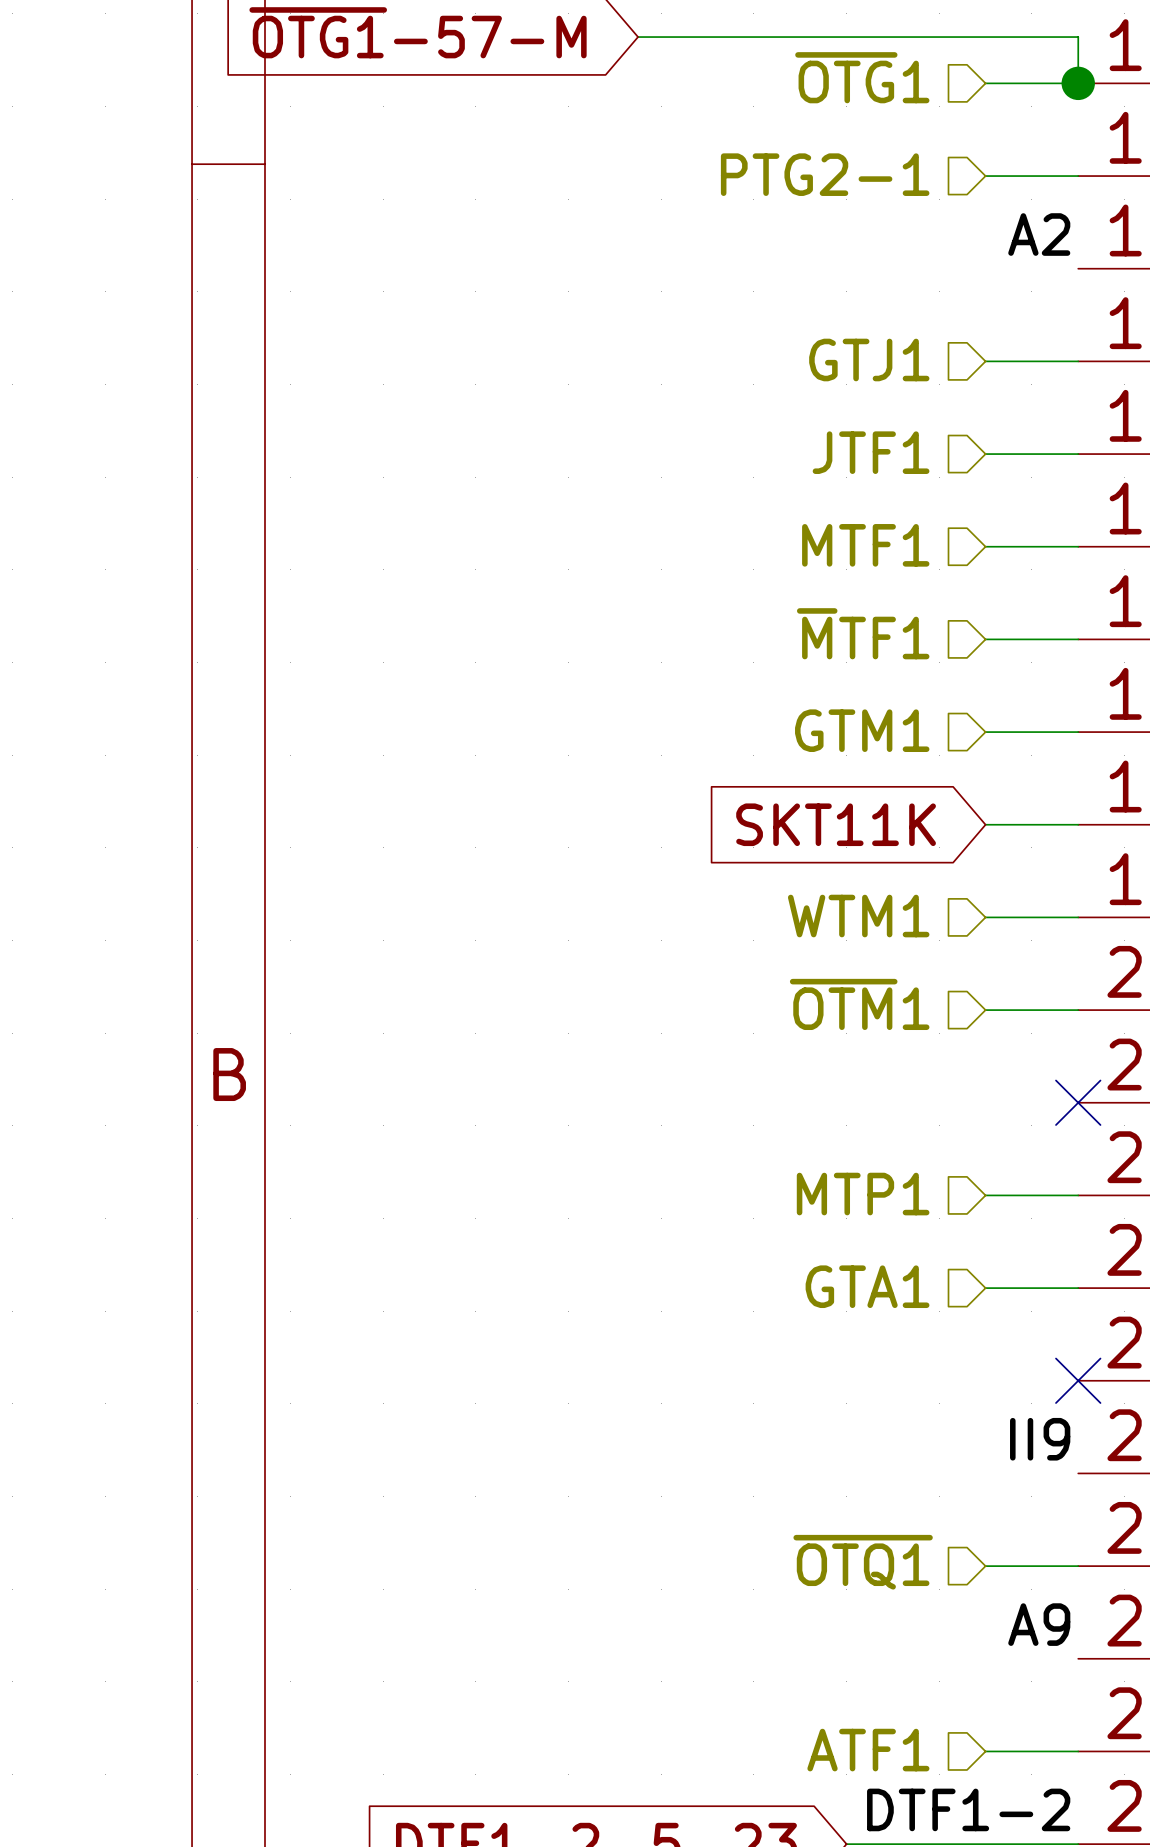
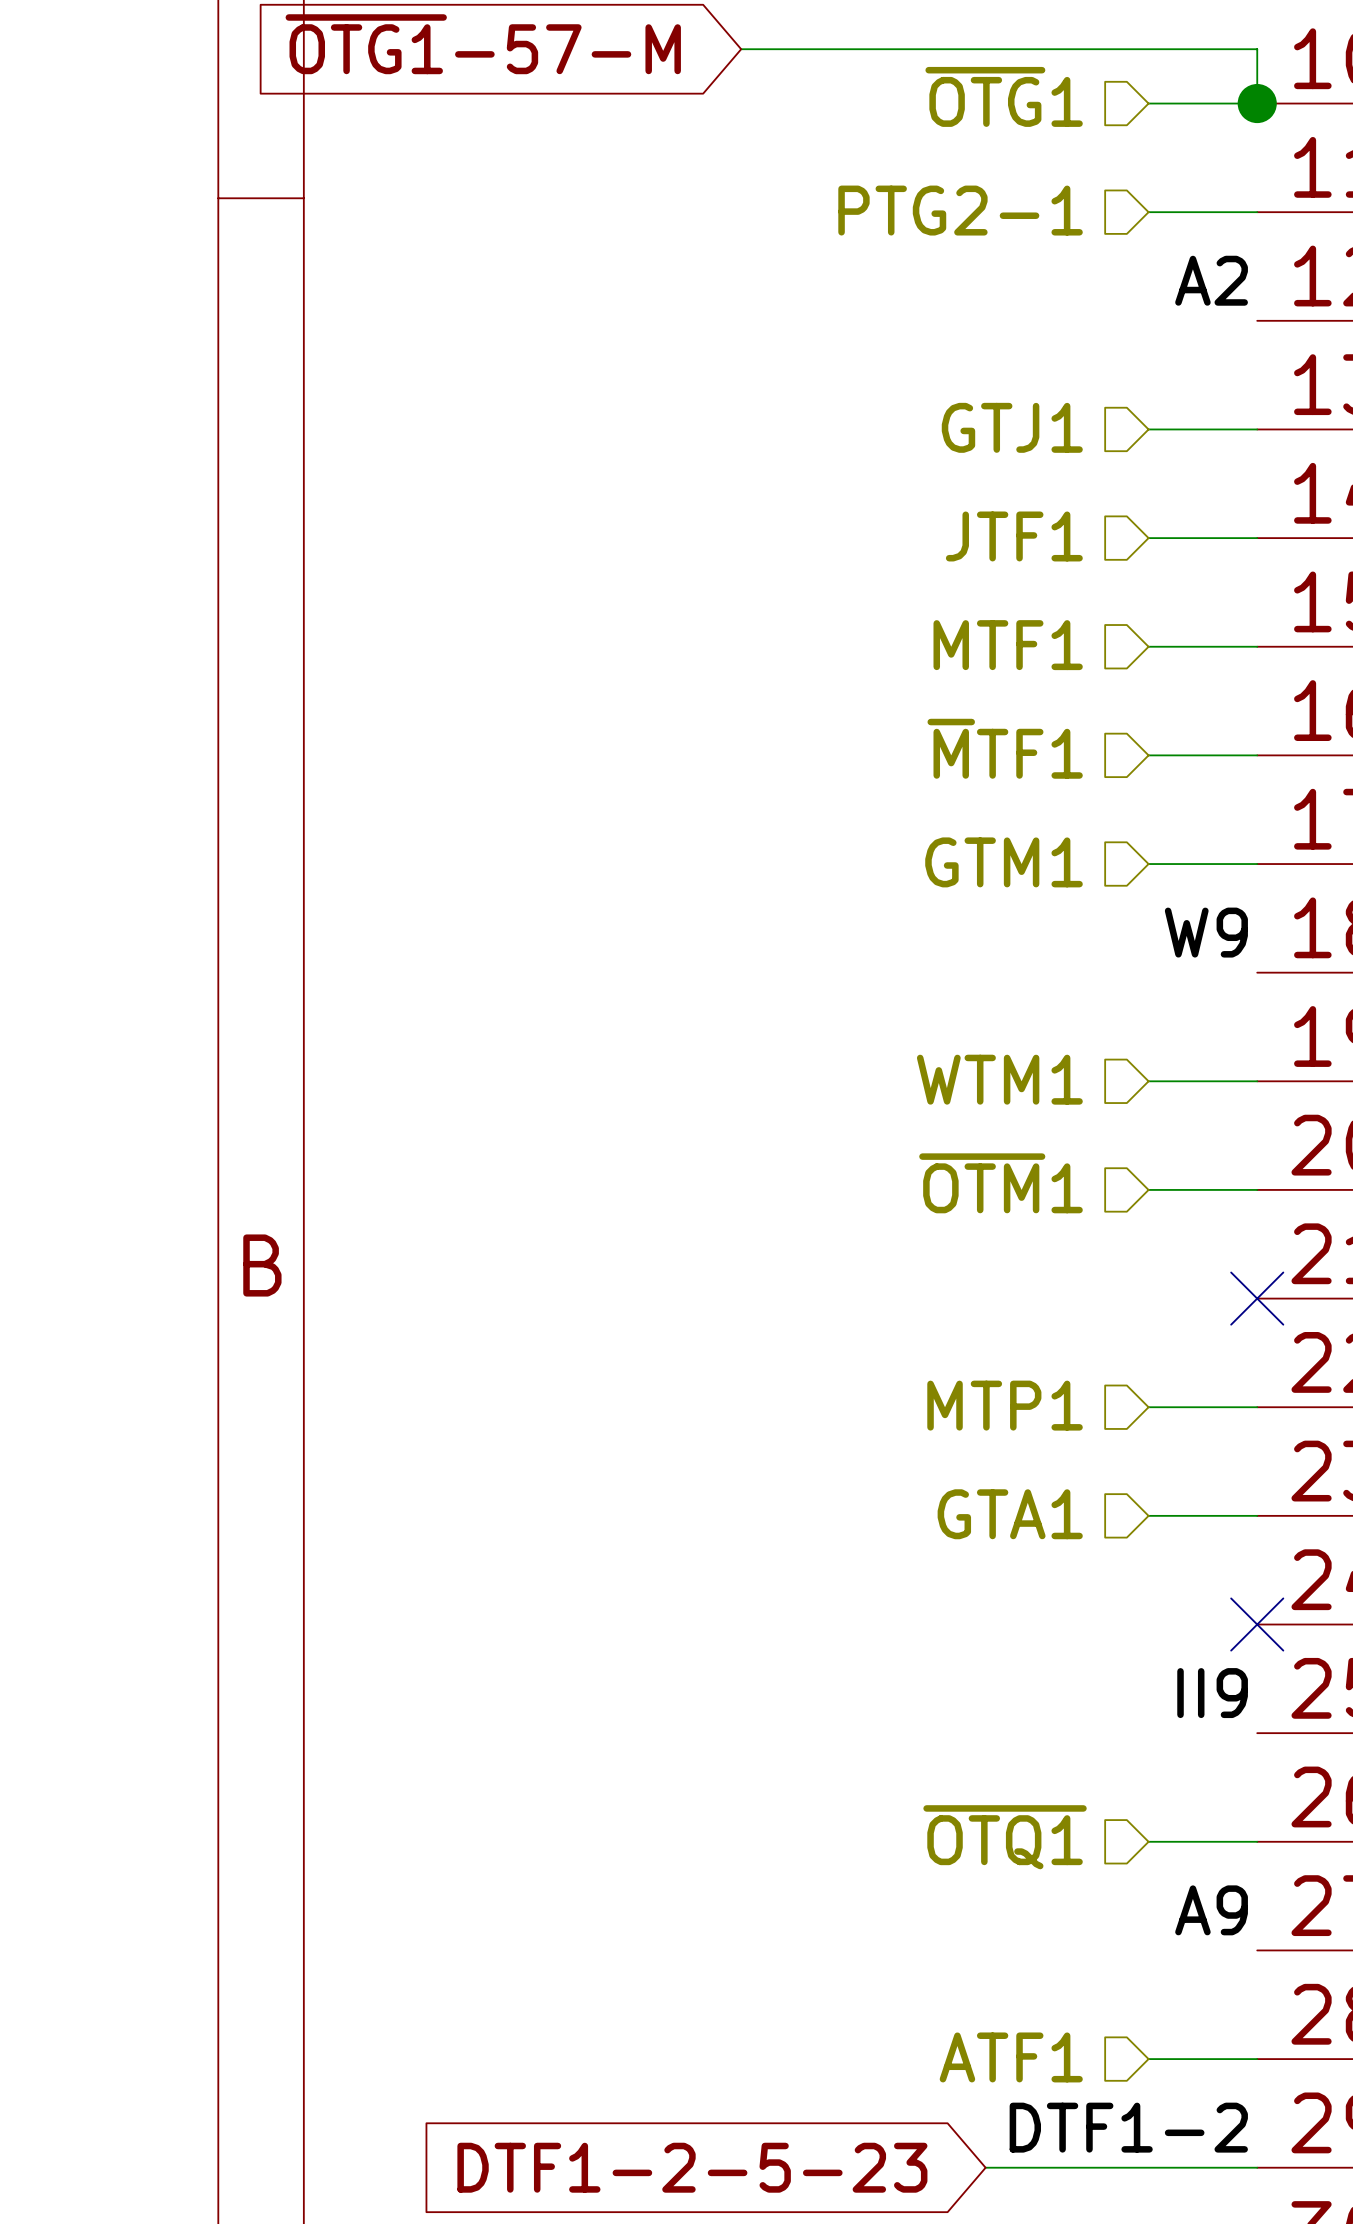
label: none -> W9 (1206, 932)
global label: SKT11K (836, 824) -> none
wire: (985, 824) (1078, 824) -> none

